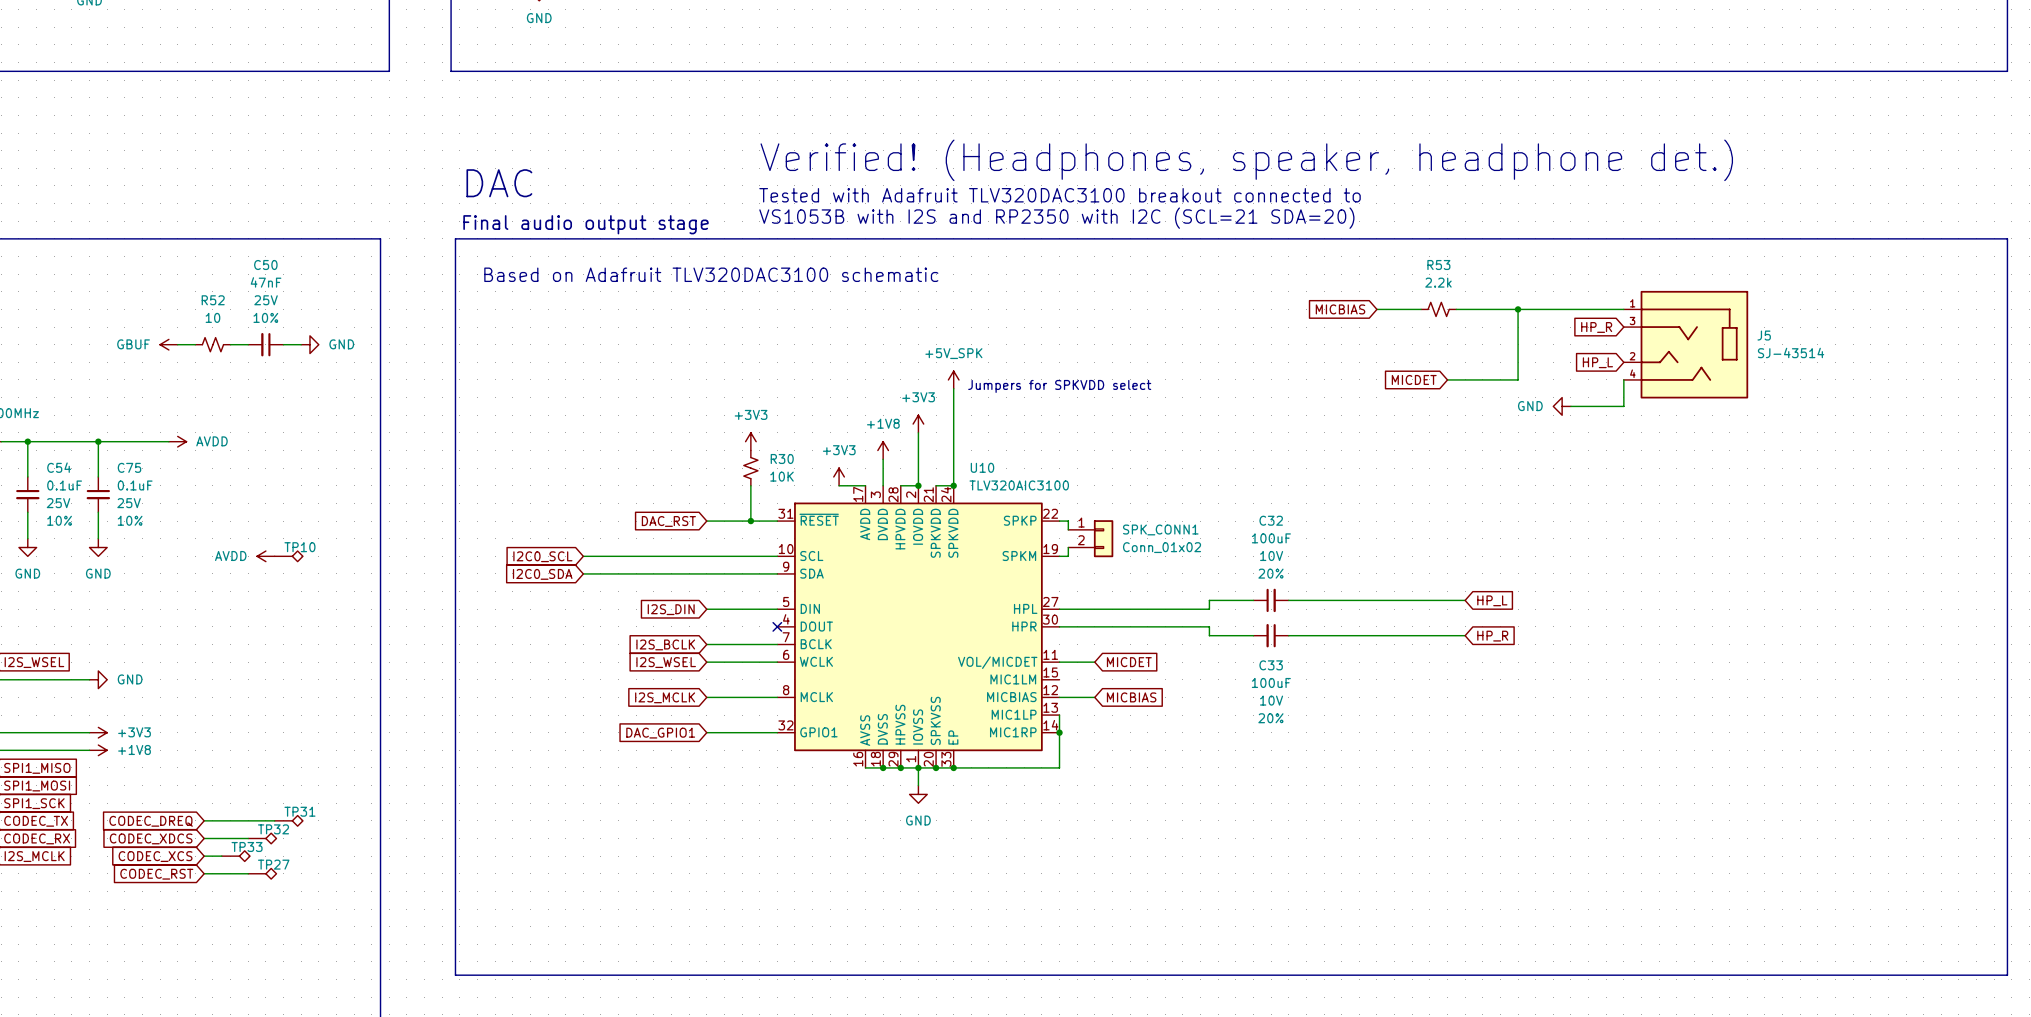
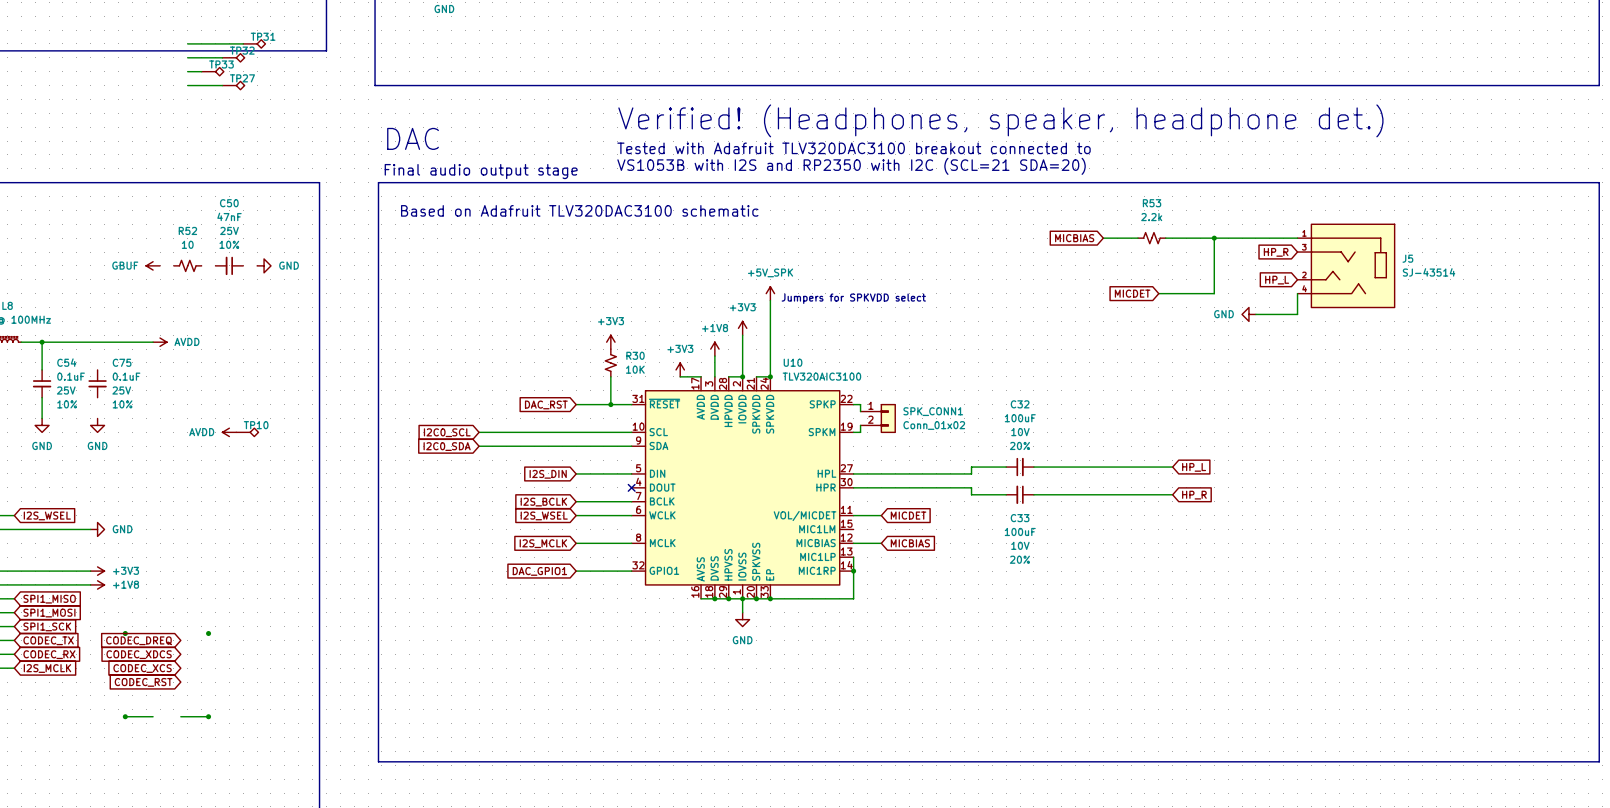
wire: none -> (187, 43) (243, 43)
line: (451, 71) (2007, 71) -> (375, 50) (375, 85) (1599, 85) (1599, 50)
wire: none -> (187, 57) (222, 57)
wire: none -> (187, 71) (201, 71)
wire: none -> (187, 85) (222, 85)
wire: (177, 344) (195, 344) -> none
wire: (230, 344) (248, 344) -> none
wire: (283, 344) (301, 344) -> none
wire: (98, 441) (98, 476) -> none
junction: (98, 441) -> none
wire: (98, 512) (98, 538) -> none
junction: none -> (125, 633)
junction: none -> (208, 633)
wire: (204, 820) (274, 820) -> none
TP31 position: (288, 820) -> (254, 43)
wire: (204, 838) (248, 838) -> none
TP32 position: (262, 838) -> (233, 57)
wire: (204, 856) (221, 856) -> none
TP33 position: (235, 856) -> (212, 71)
wire: (204, 873) (248, 873) -> none
TP27 position: (262, 873) -> (233, 85)
wire: none -> (125, 716) (153, 716)
junction: none -> (125, 716)
wire: none -> (180, 716) (208, 716)
junction: none -> (208, 716)

